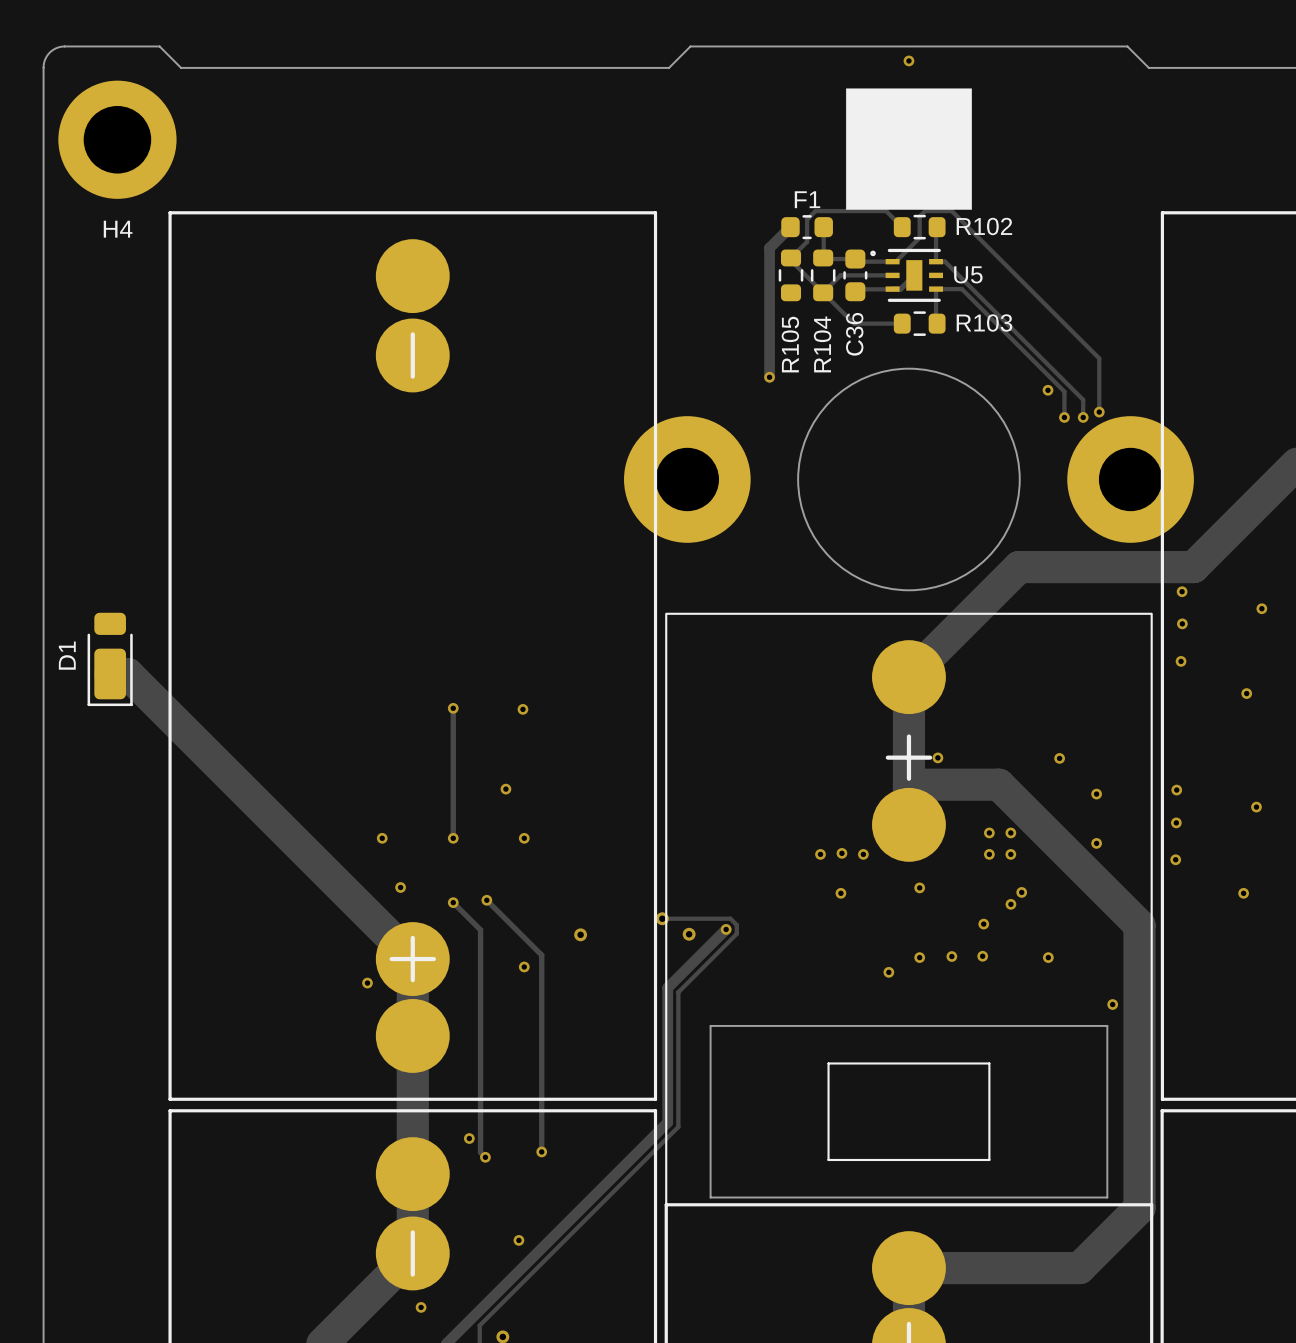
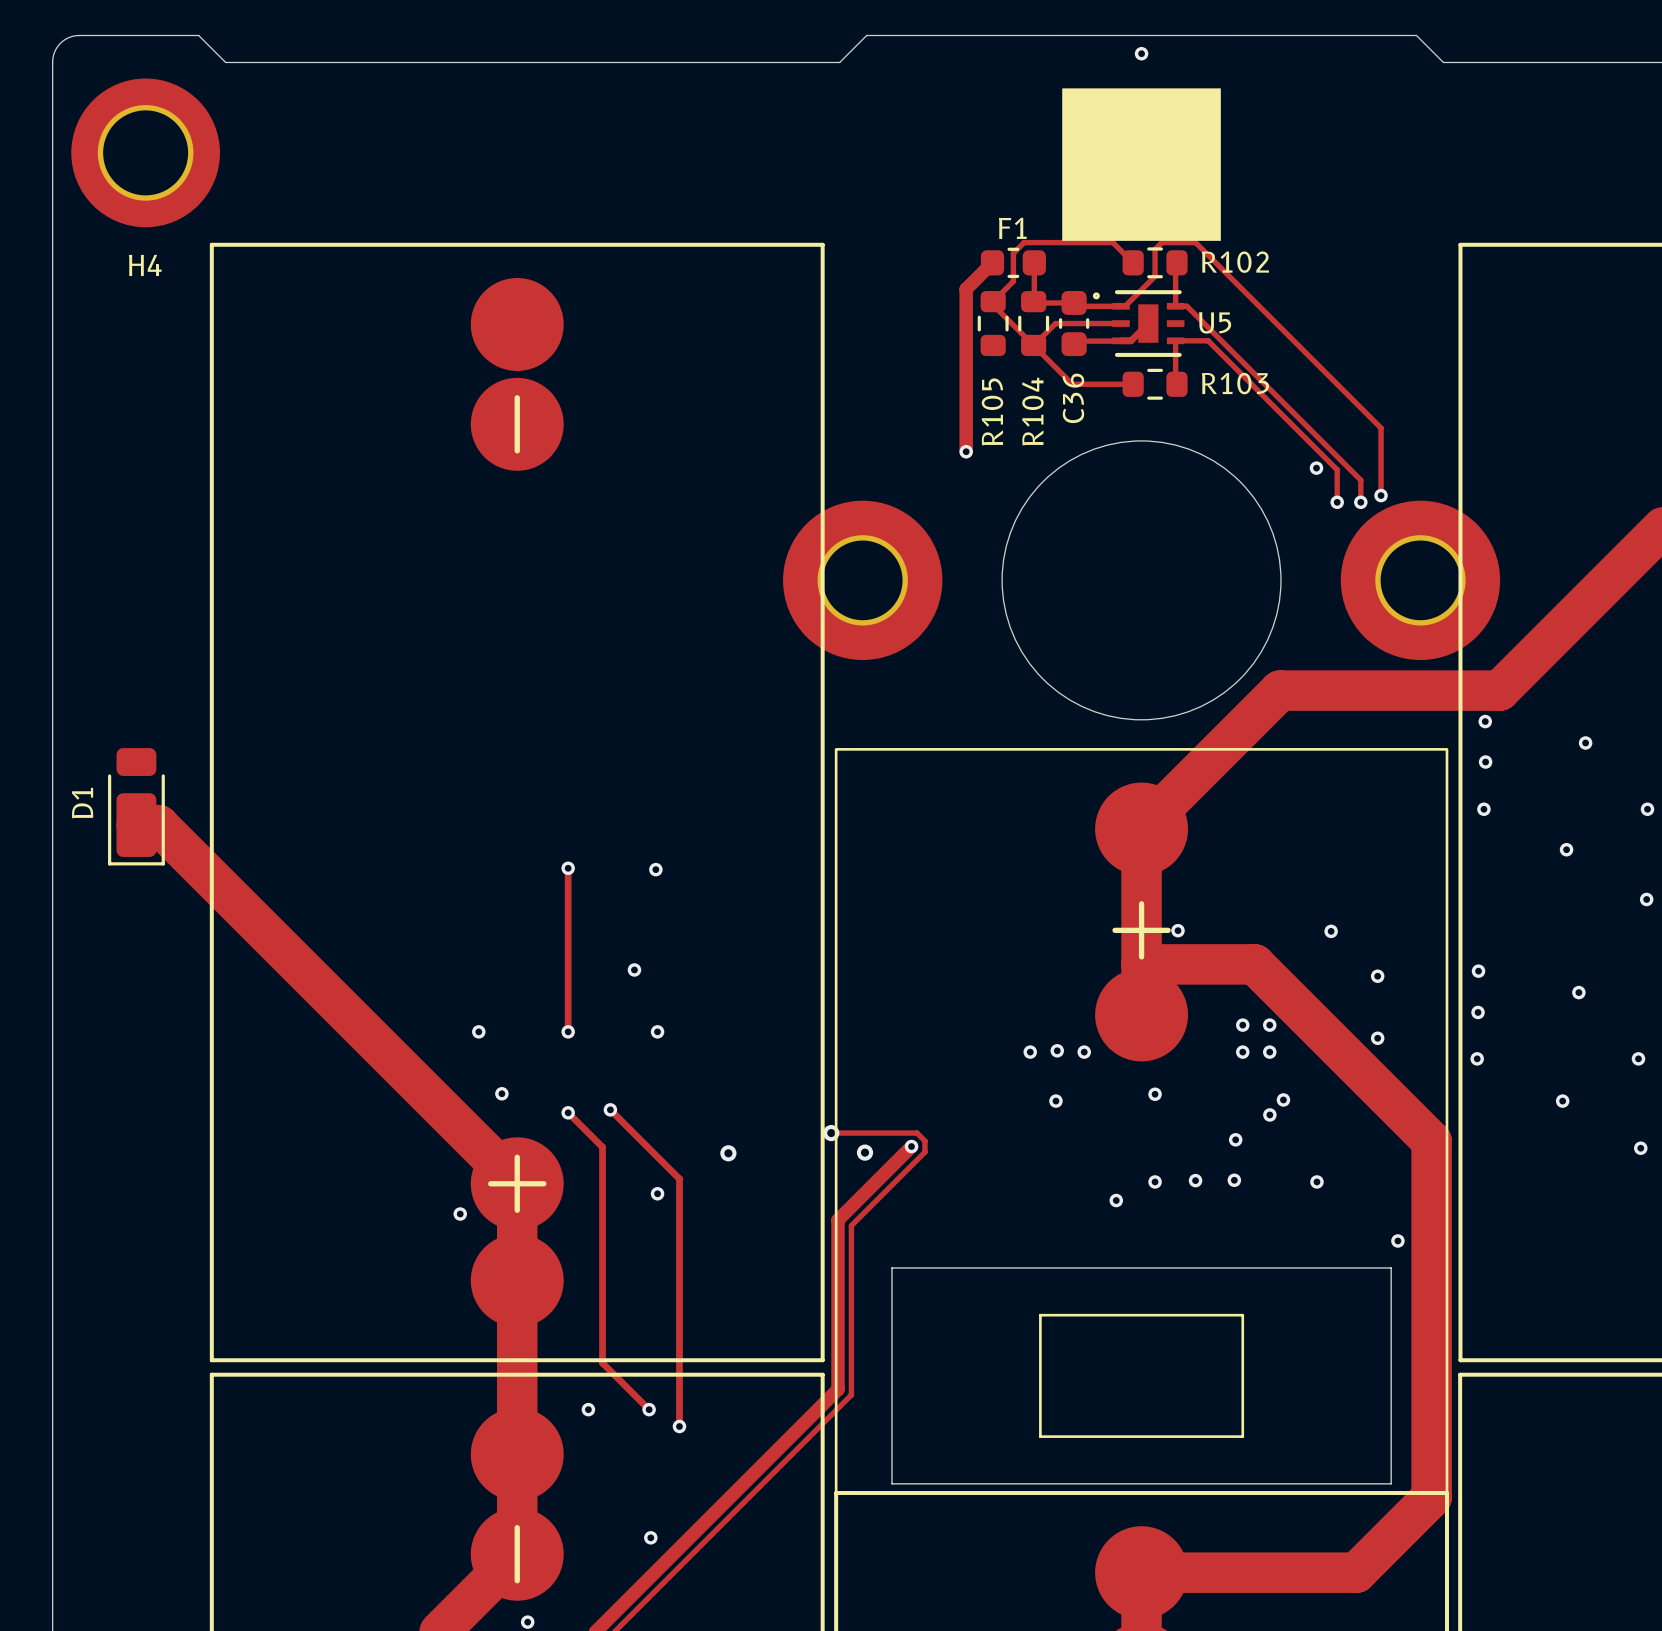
track: (480, 1101) (480, 1152) (485, 1157) -> (602, 1363) (649, 1409)
via position: (485, 1157) -> (649, 1409)

